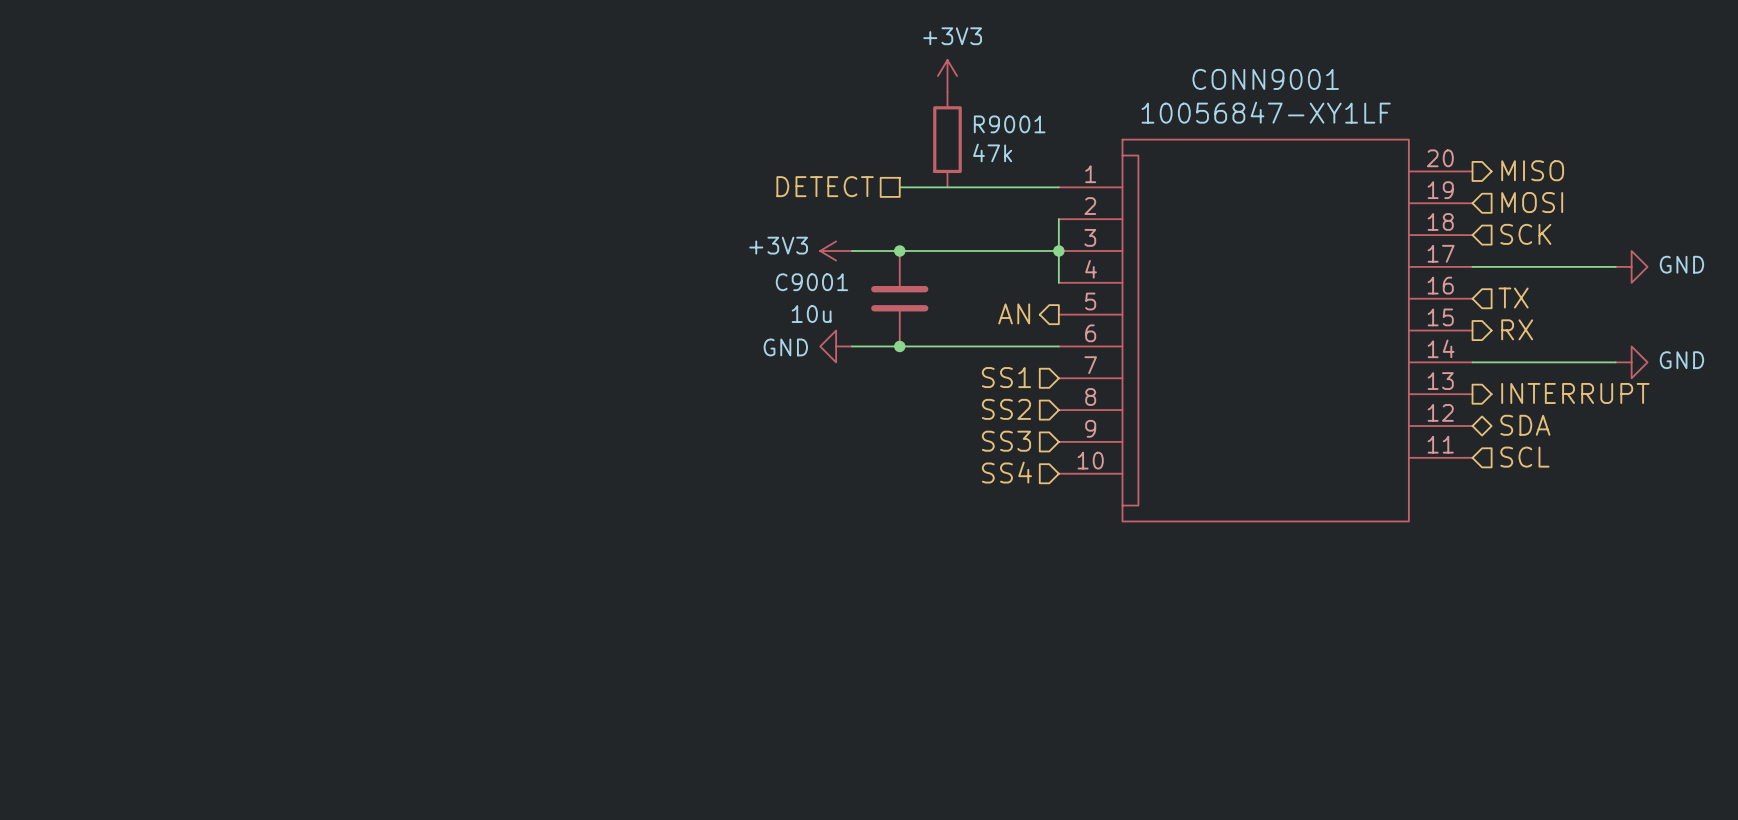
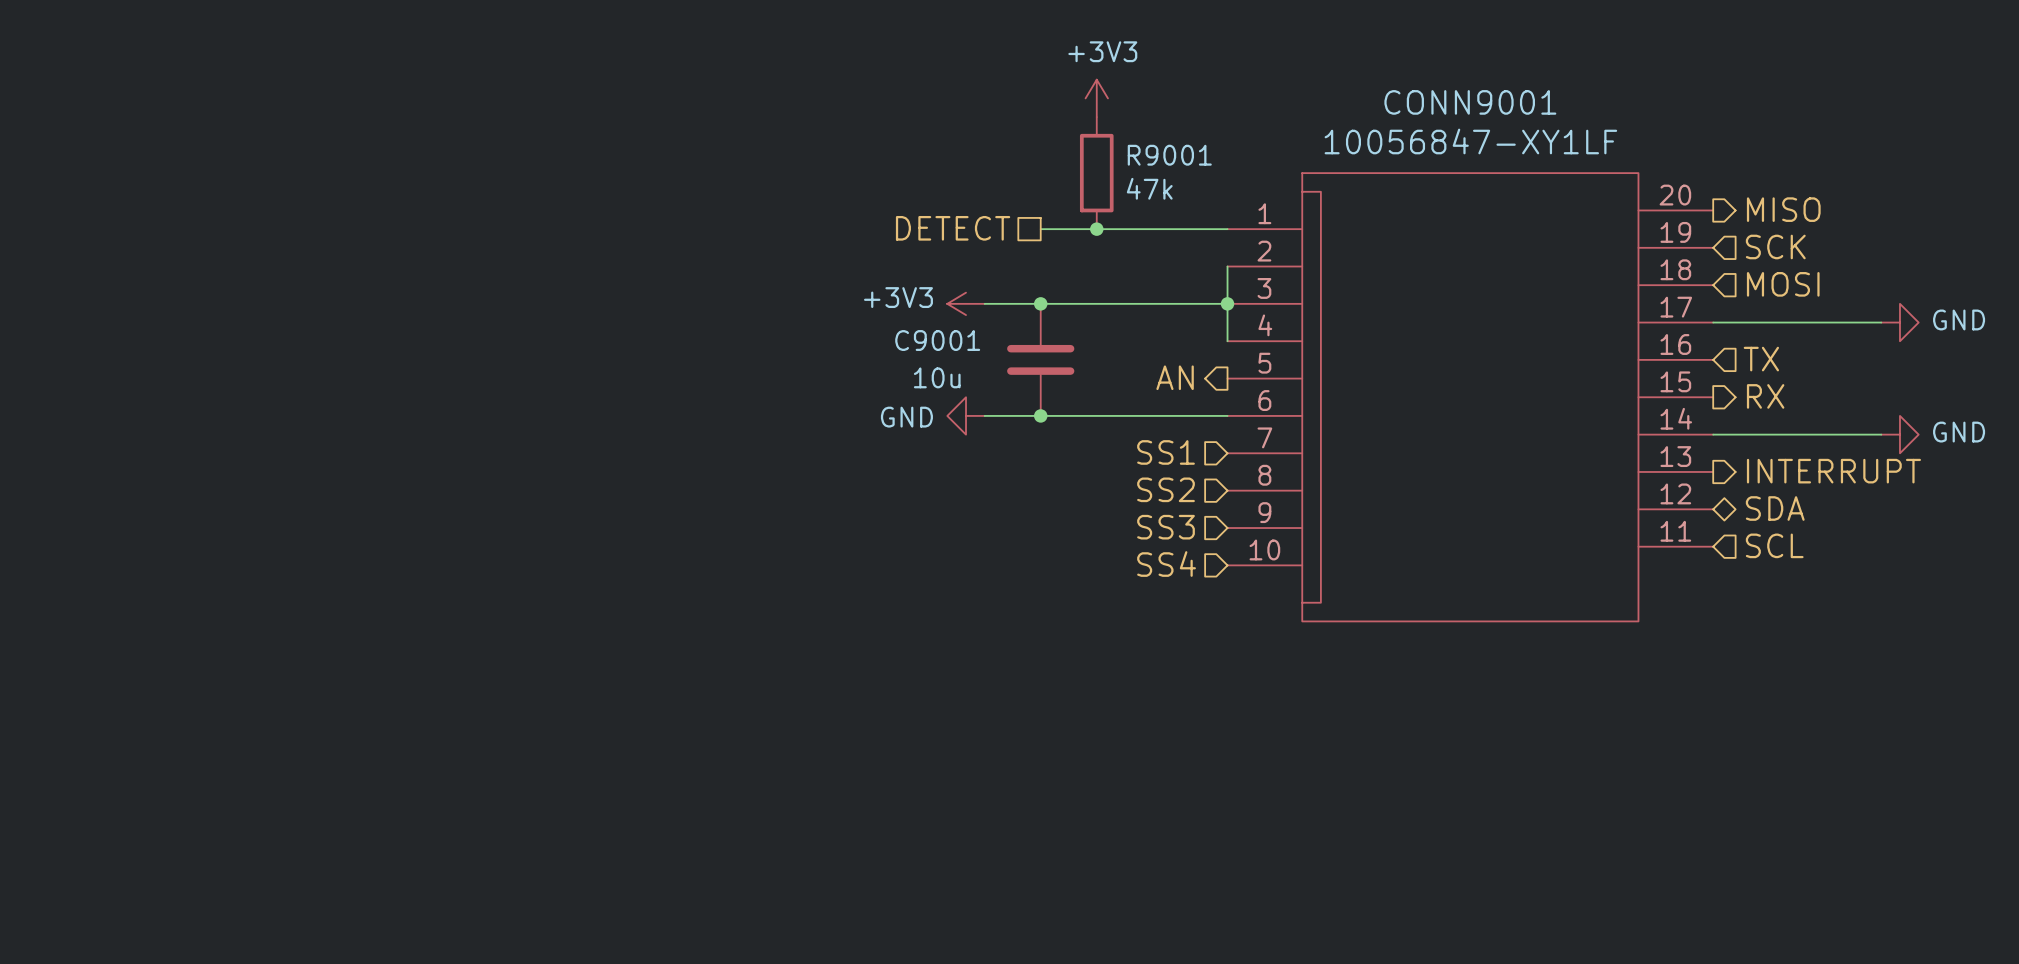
junction: none -> (1096, 229)
hierarchical label: MOSI (1532, 202) -> SCK (1775, 246)
hierarchical label: SCK (1525, 234) -> MOSI (1783, 284)

